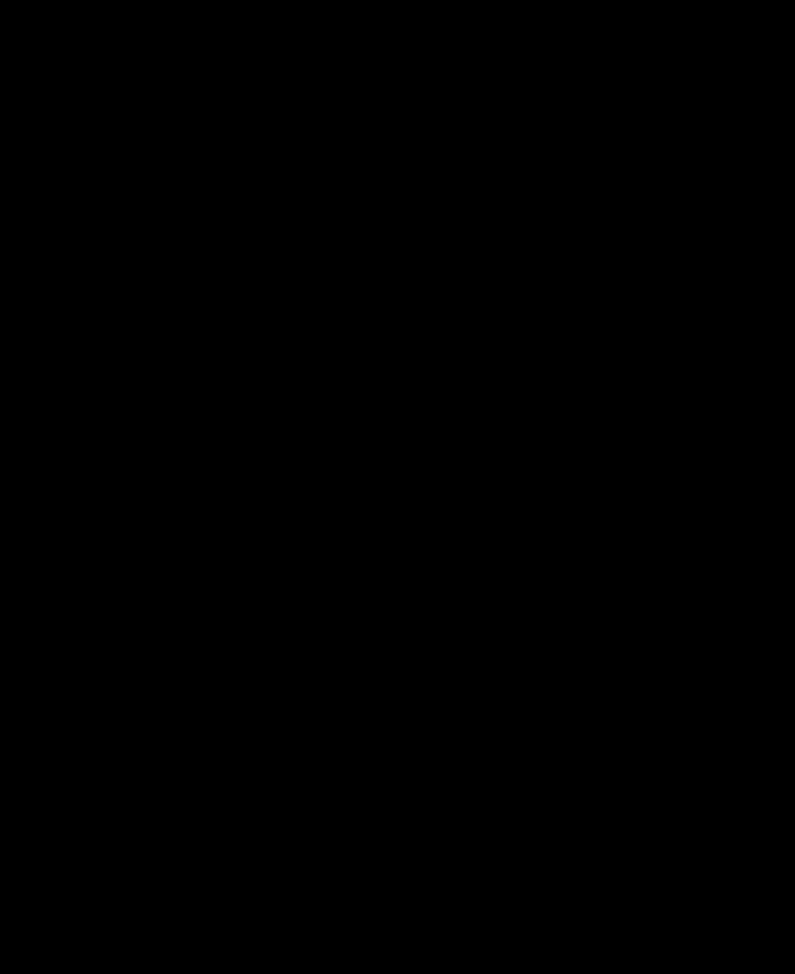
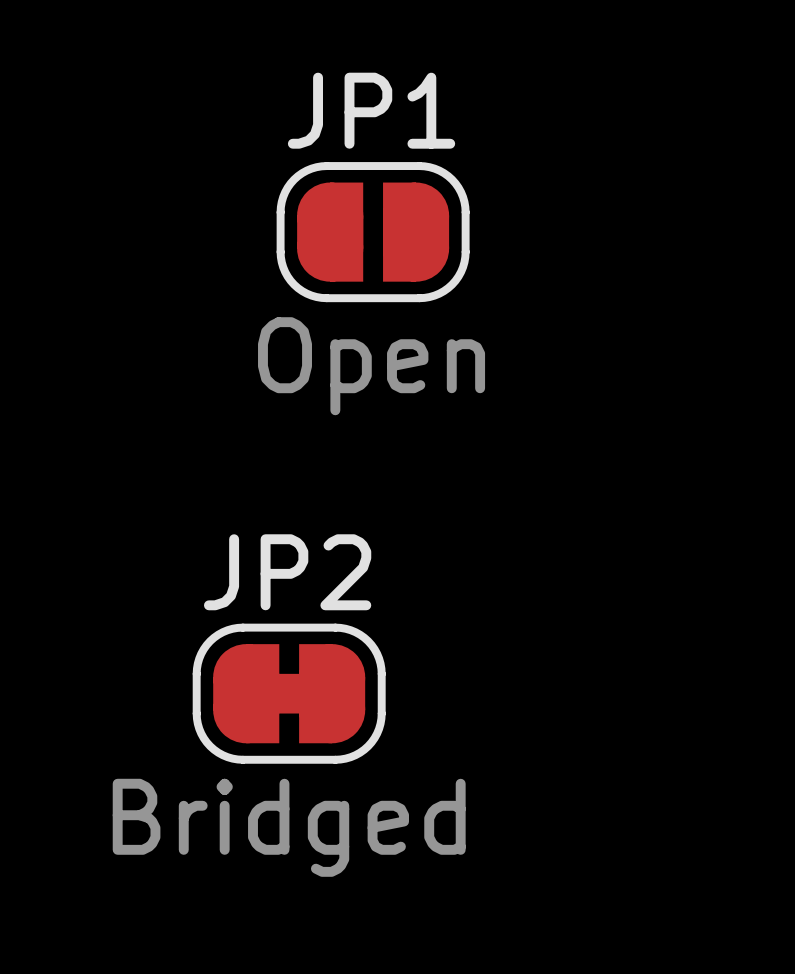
JP1: none -> Open (373, 232)
JP2: none -> Bridged (289, 693)

